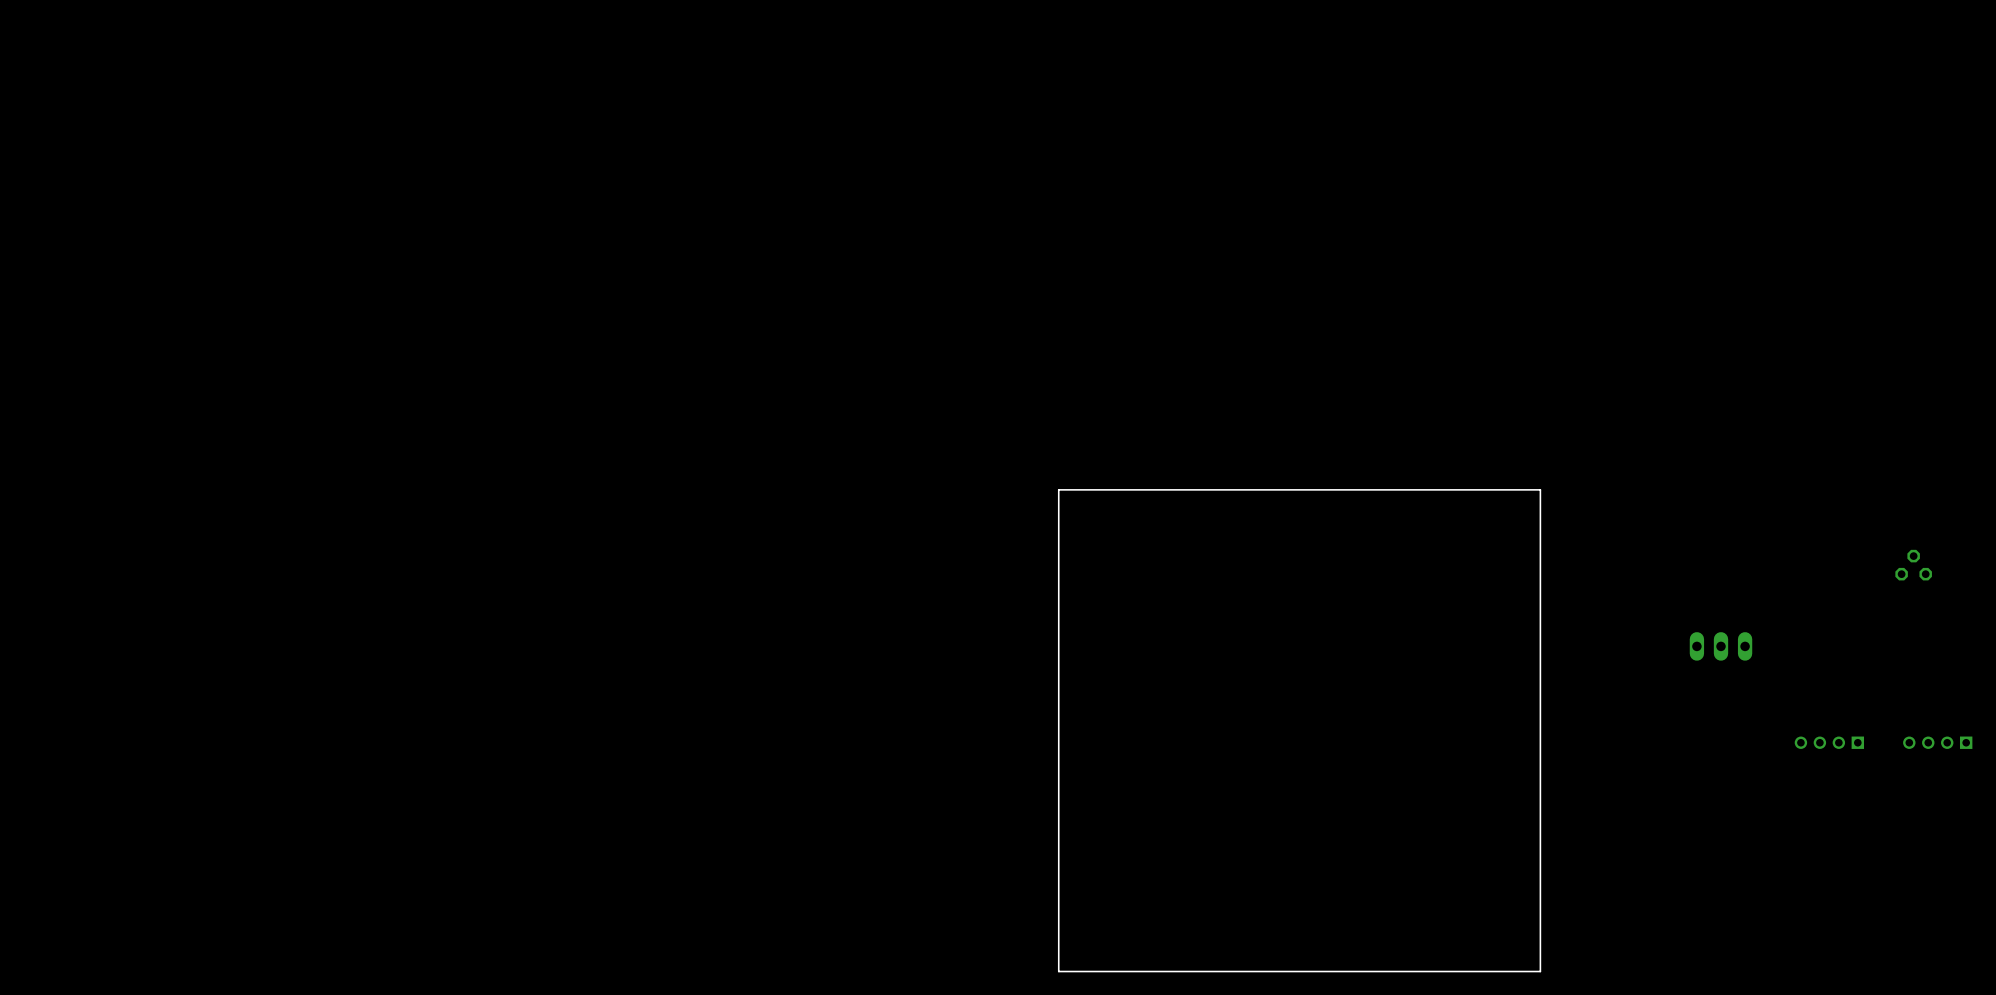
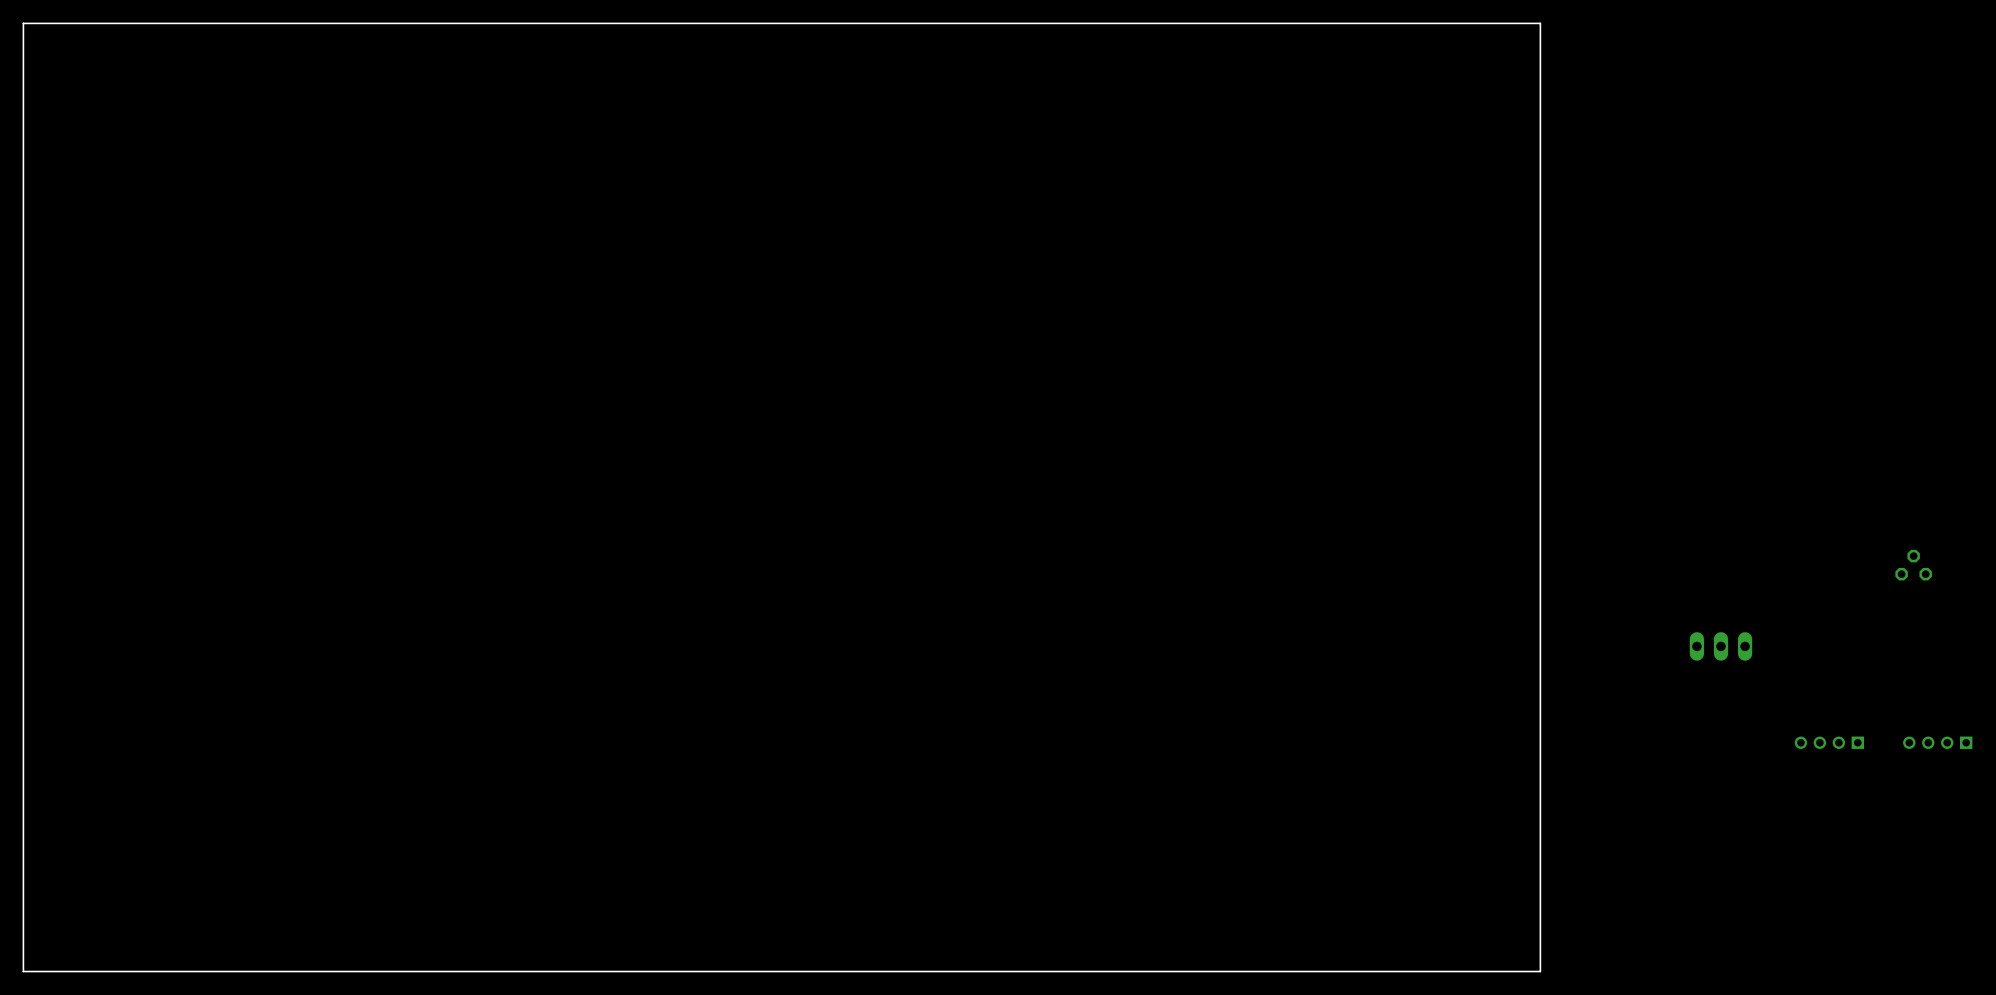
board edge: (1540, 489) (1058, 489) (1058, 971) -> (1540, 489) (1540, 23) (23, 23) (23, 971) (1058, 971)

